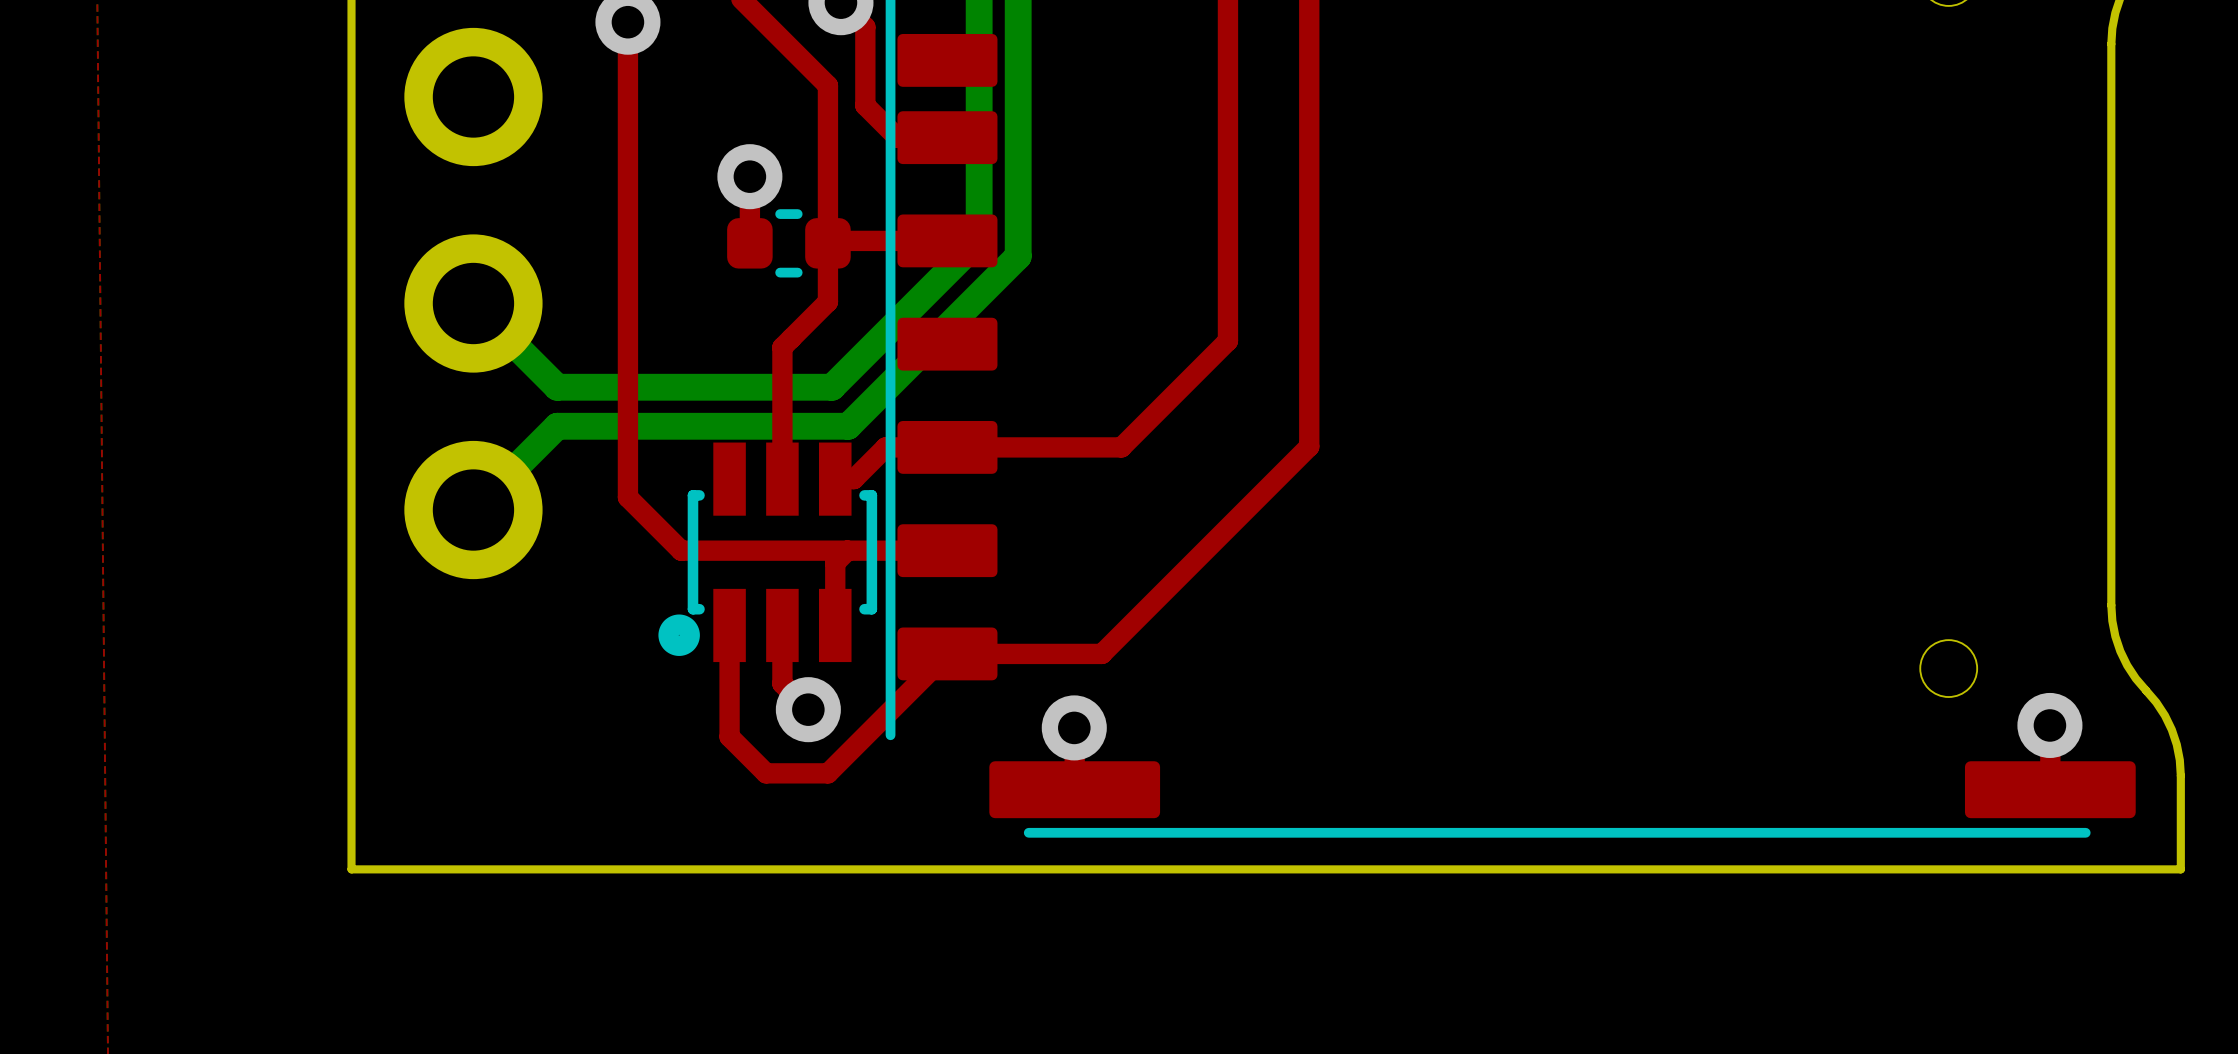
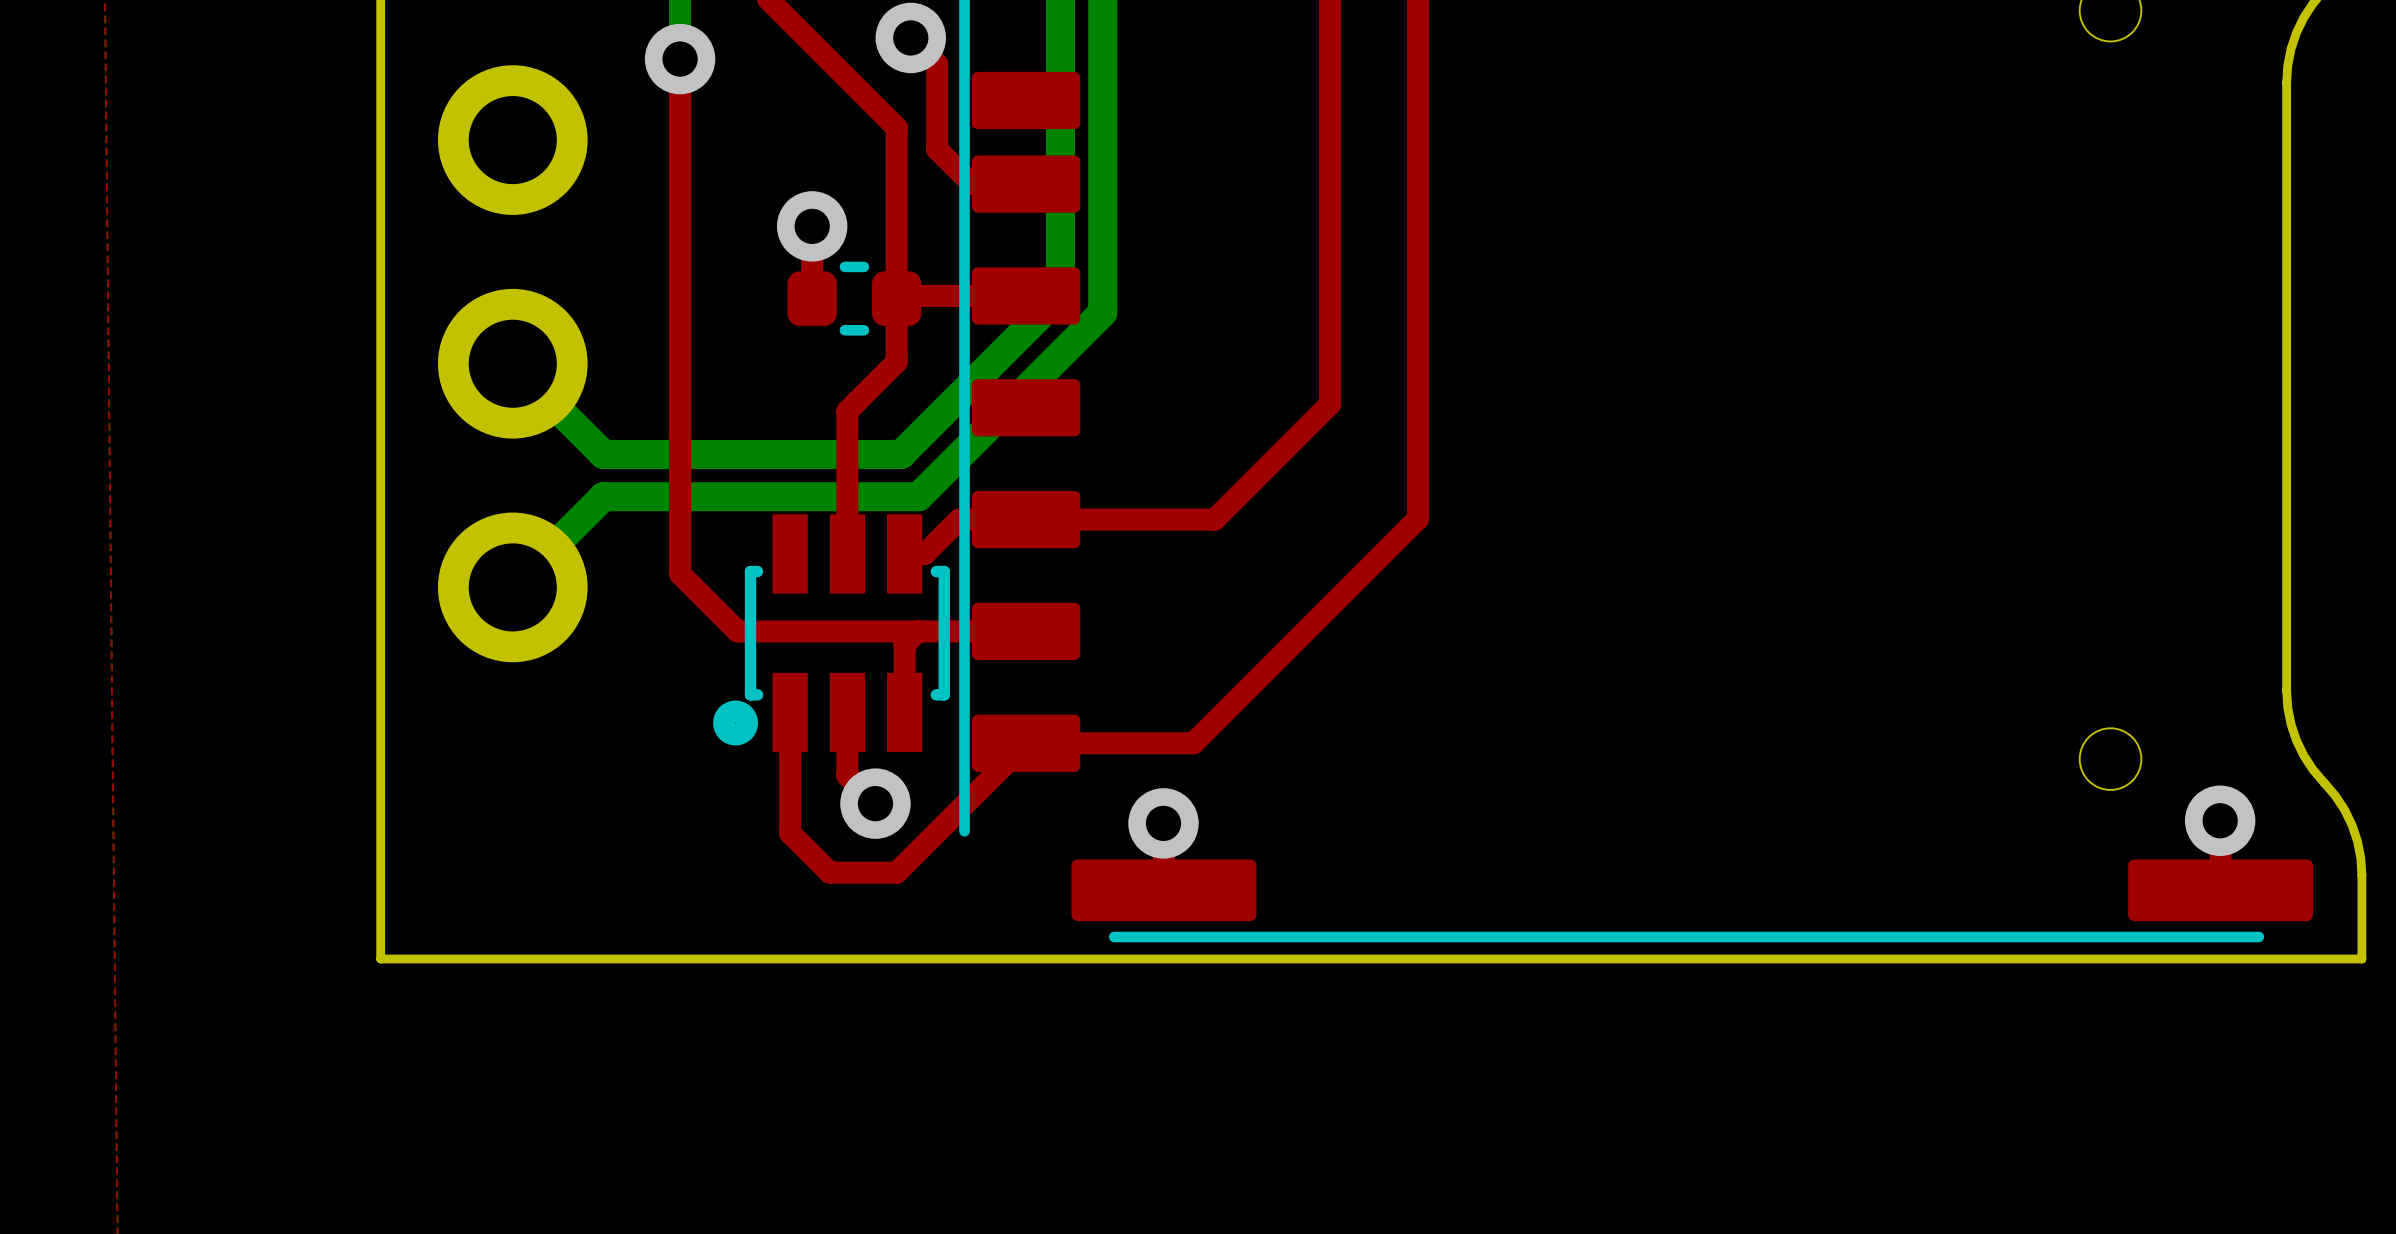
board edge: (351, 853) (351, 869) (2180, 869) (2180, 853) -> (380, 958) (2361, 958)

